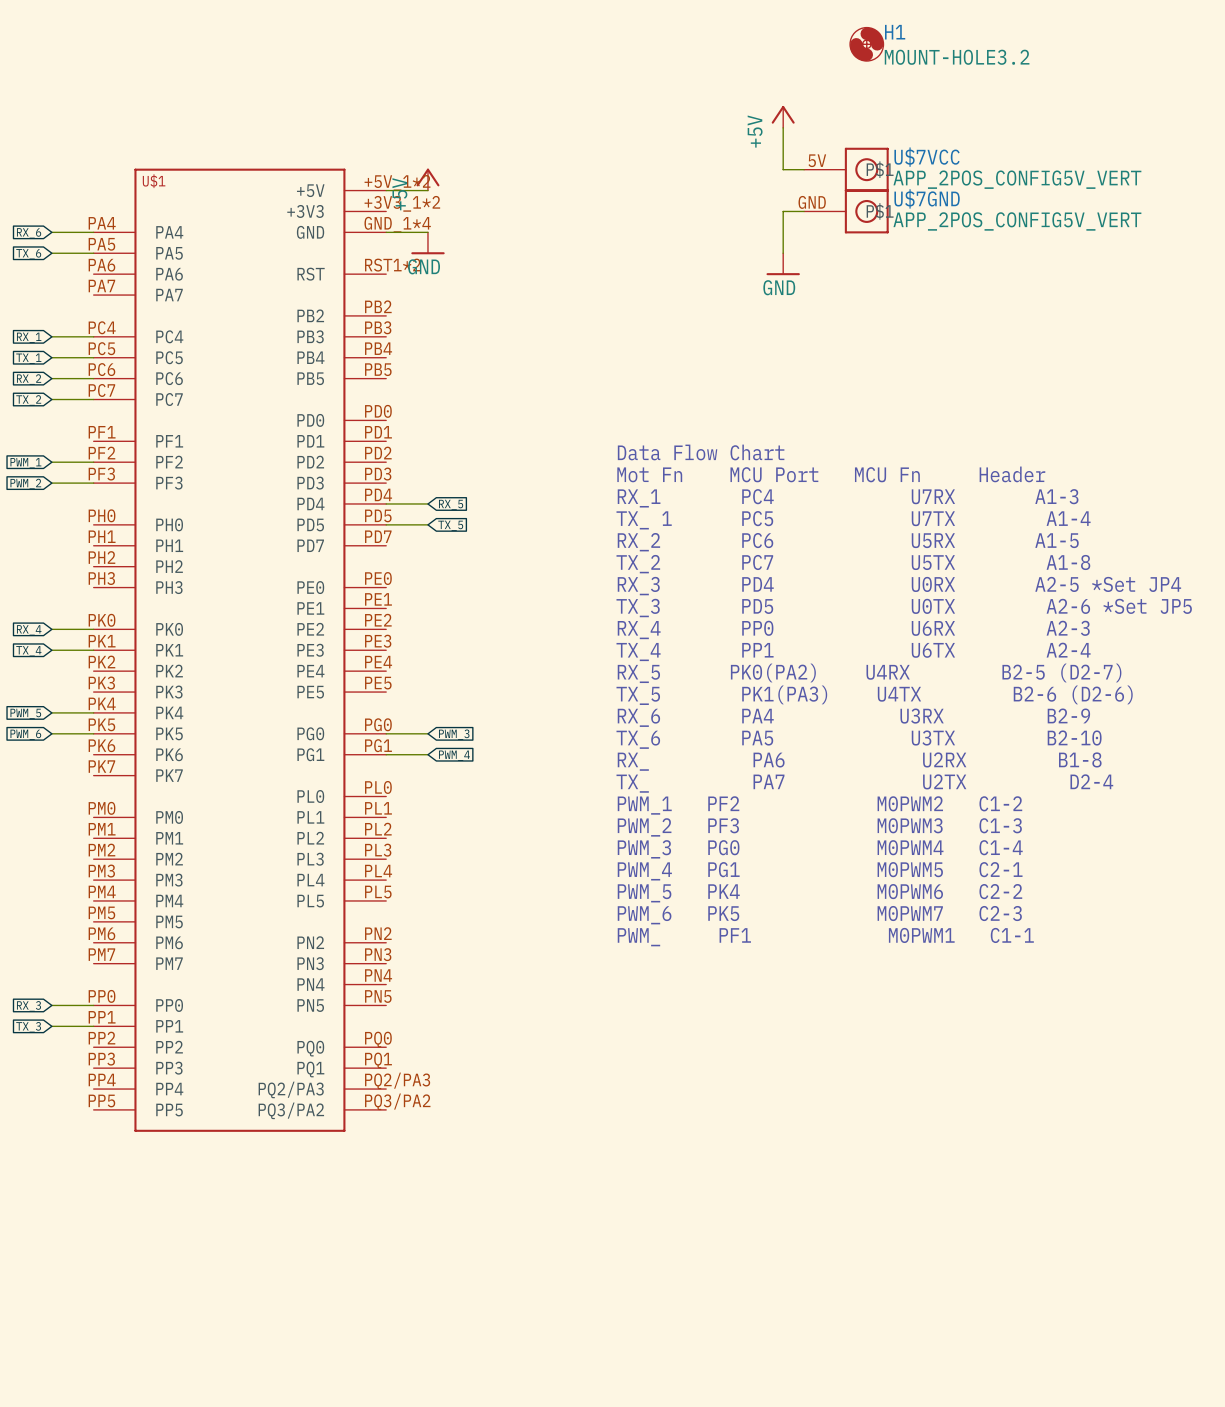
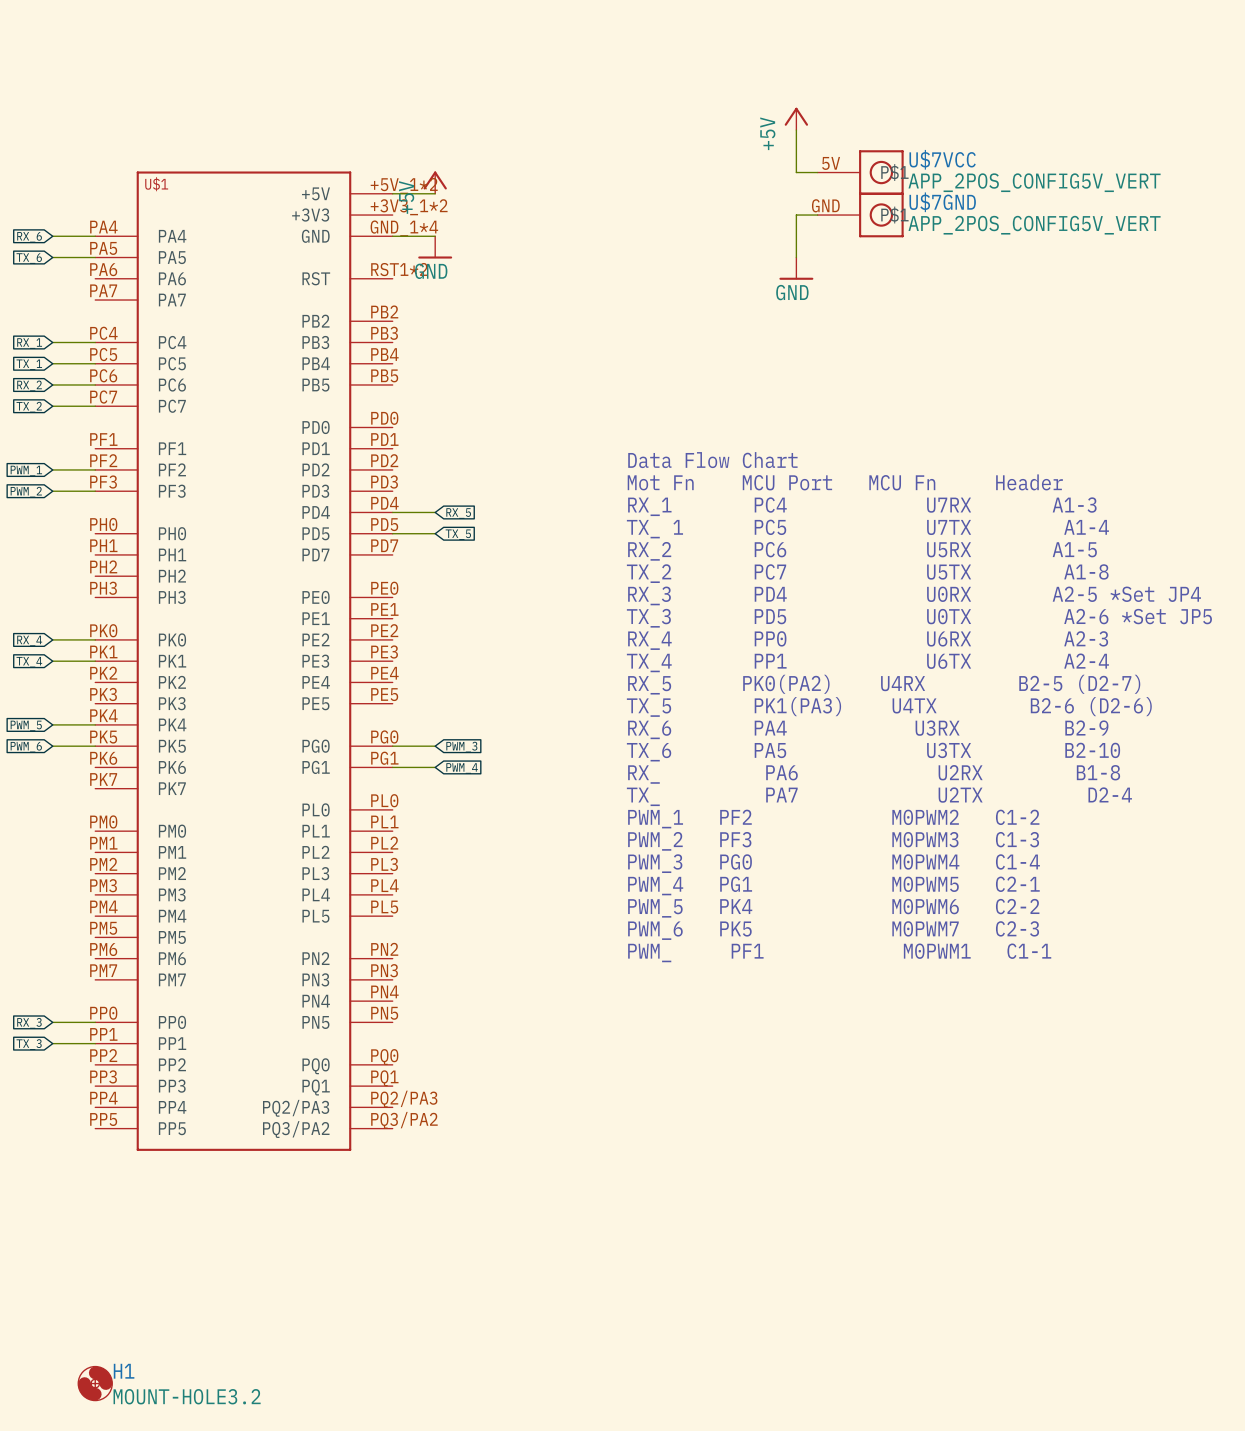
H1 position: (866, 44) -> (95, 1383)

